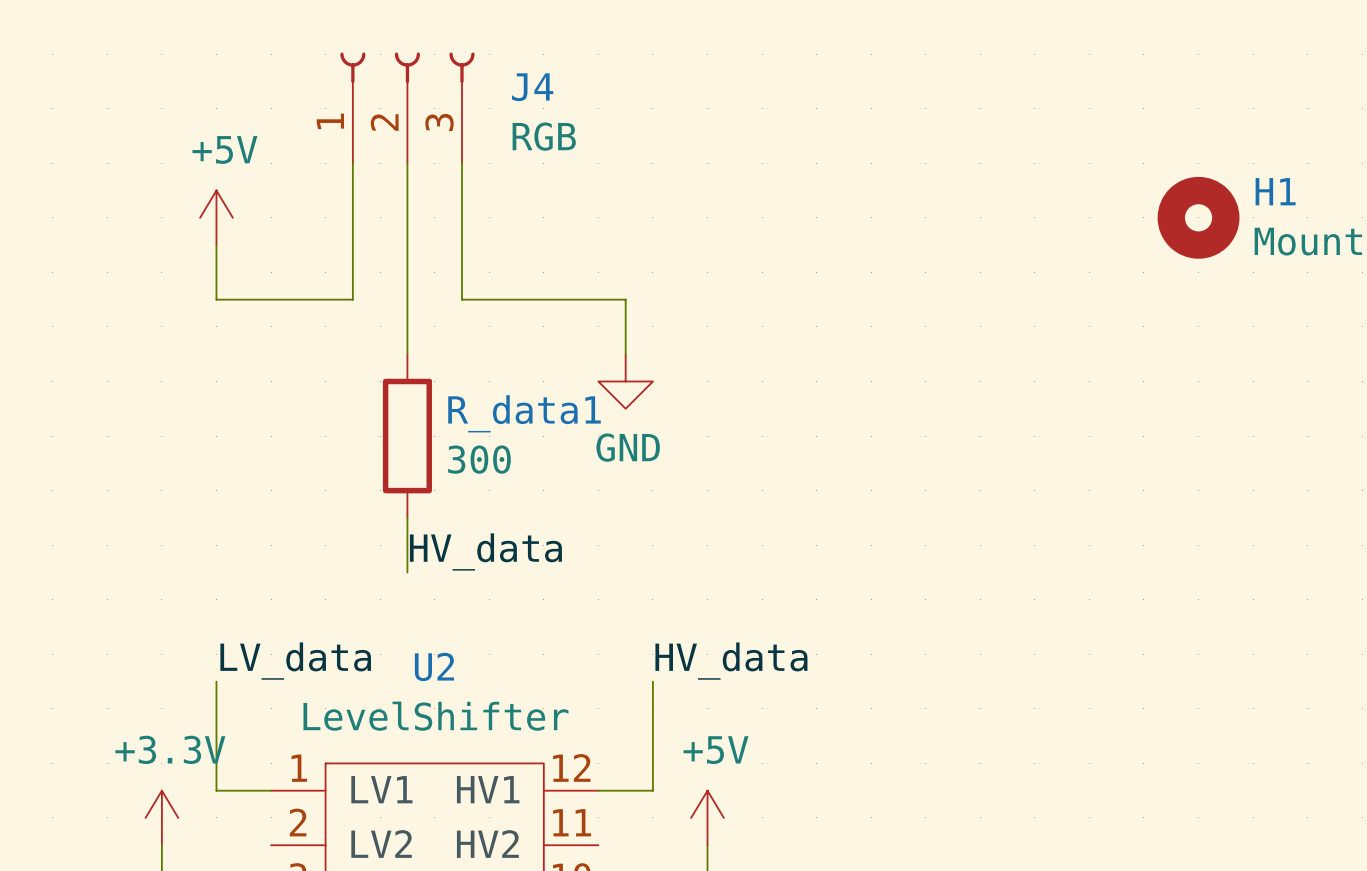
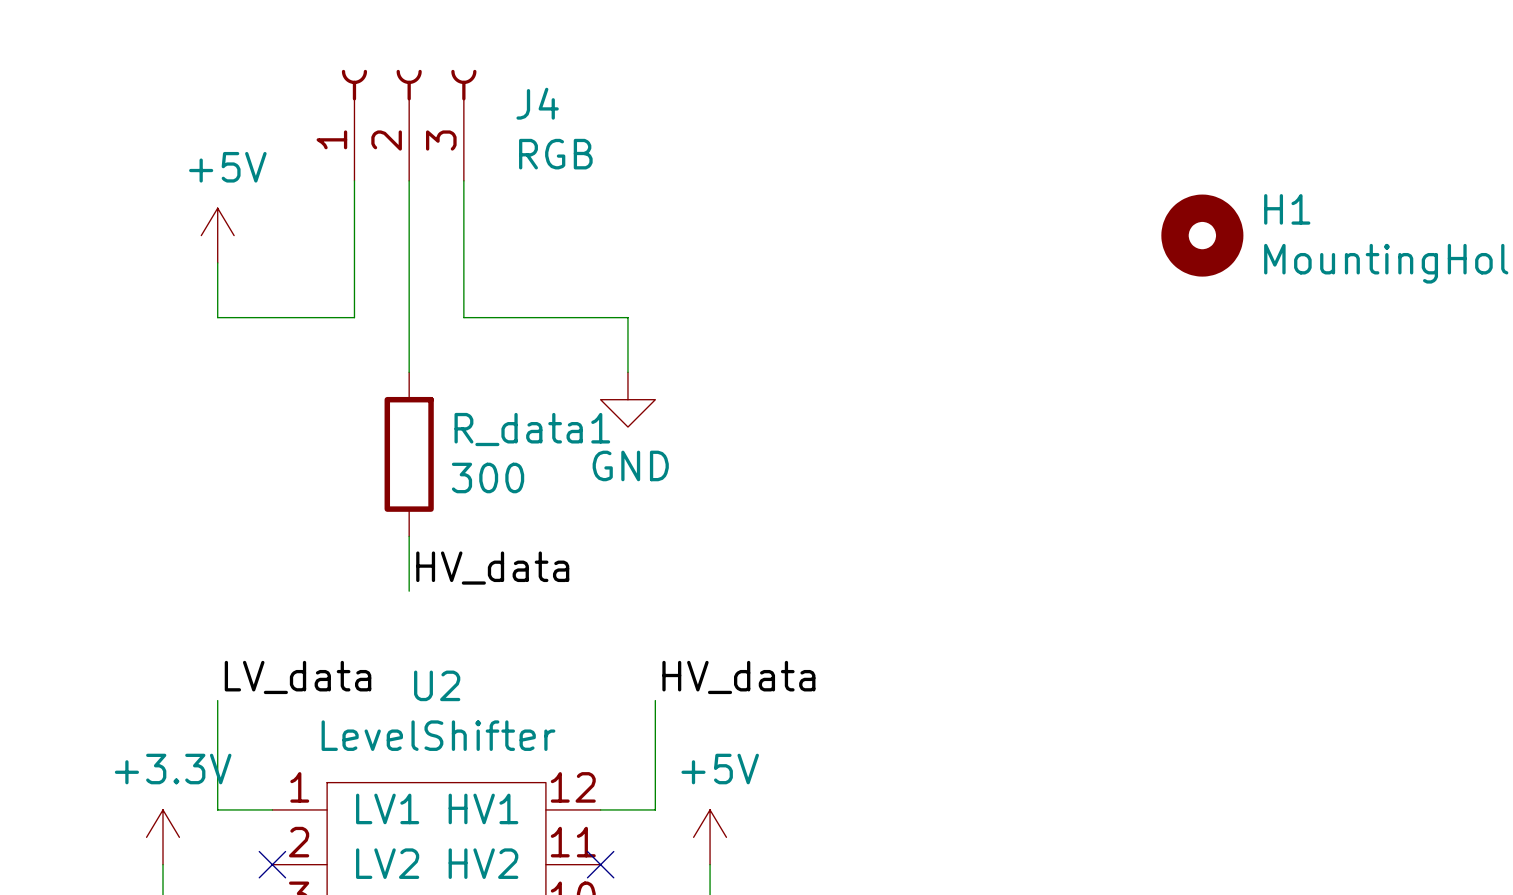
no-connect mark: none -> (272, 864)
no-connect mark: none -> (600, 864)

